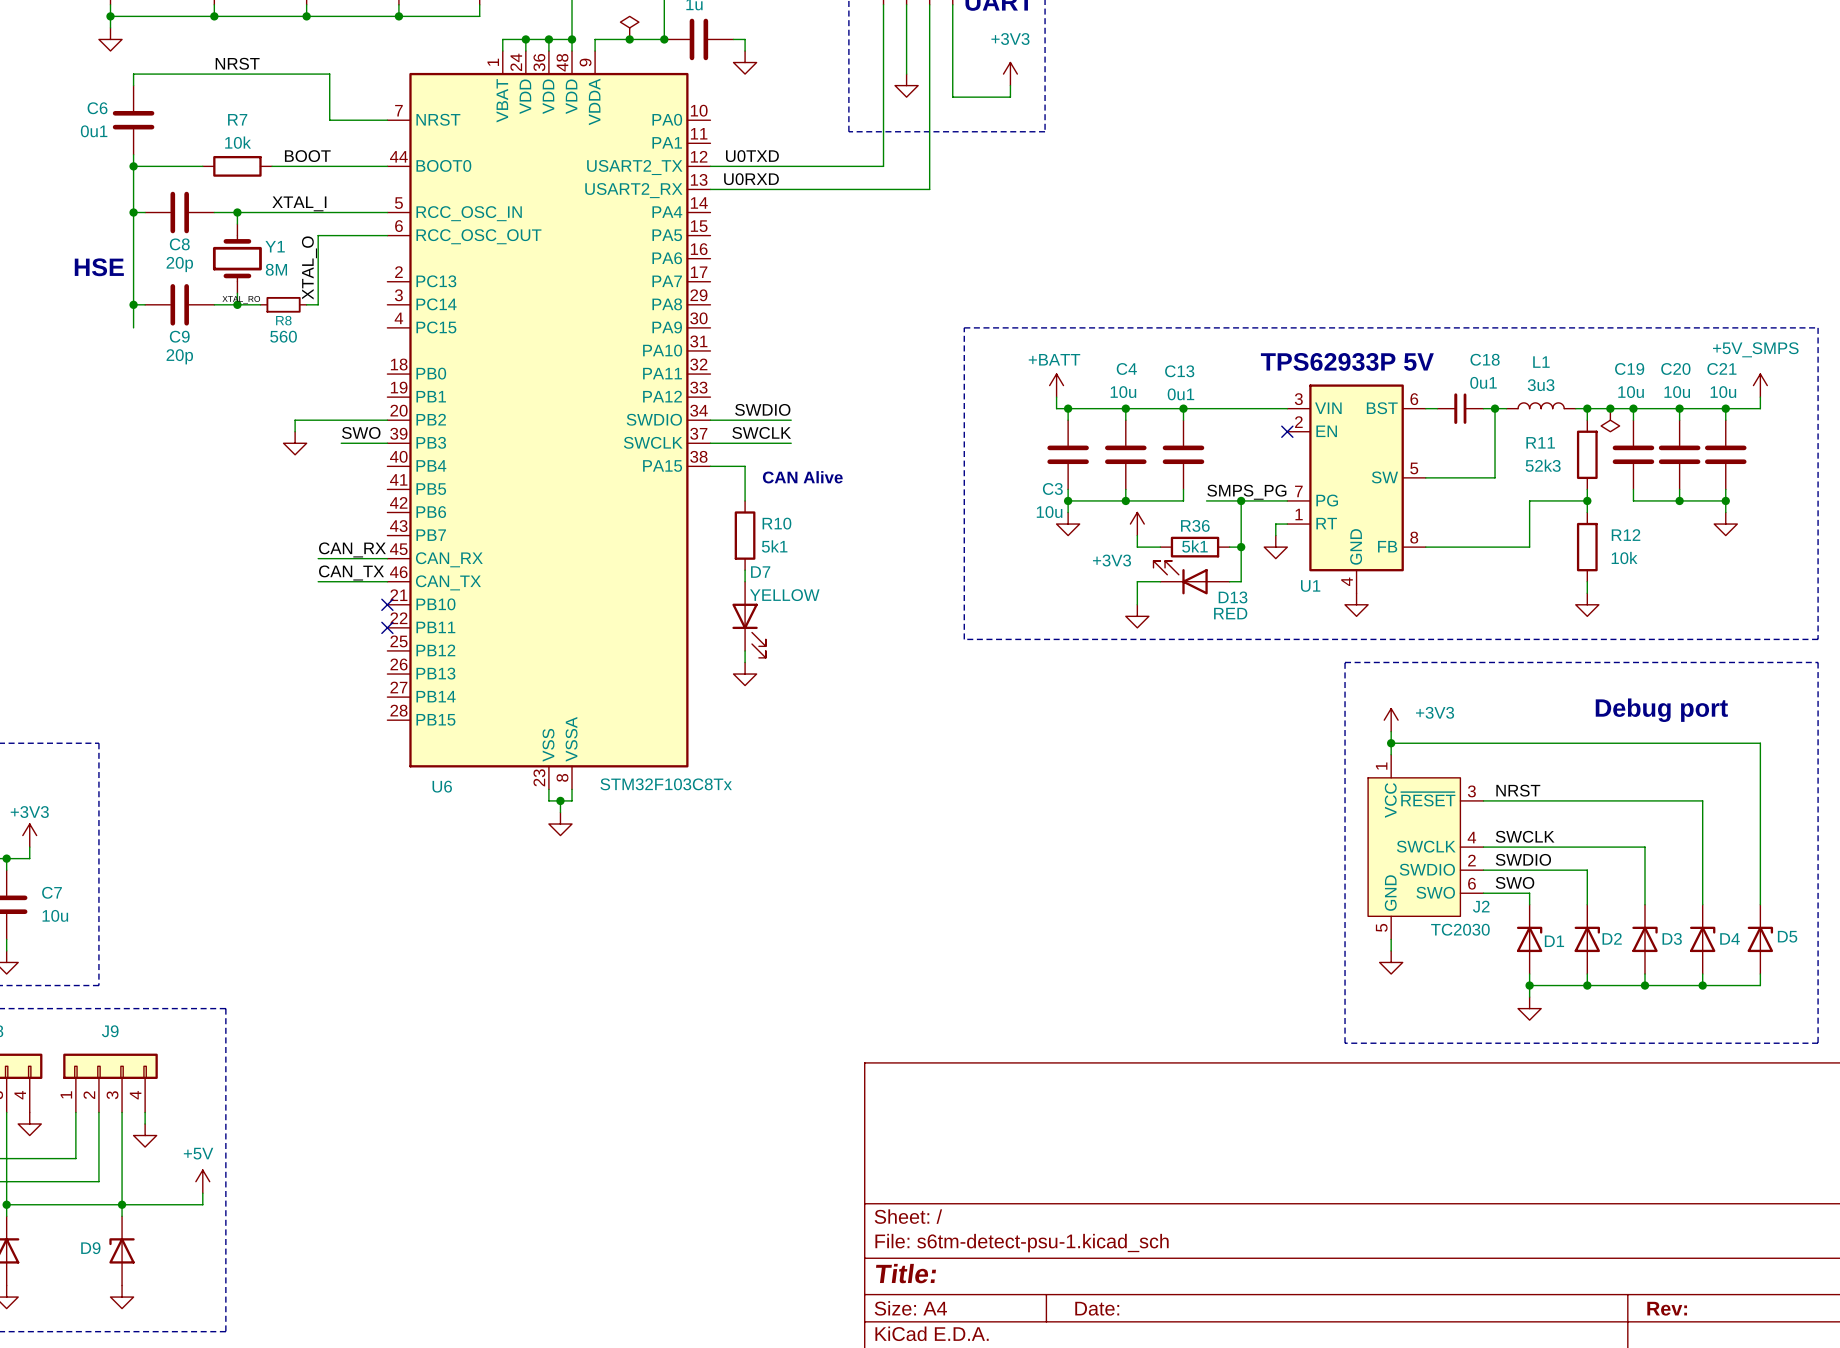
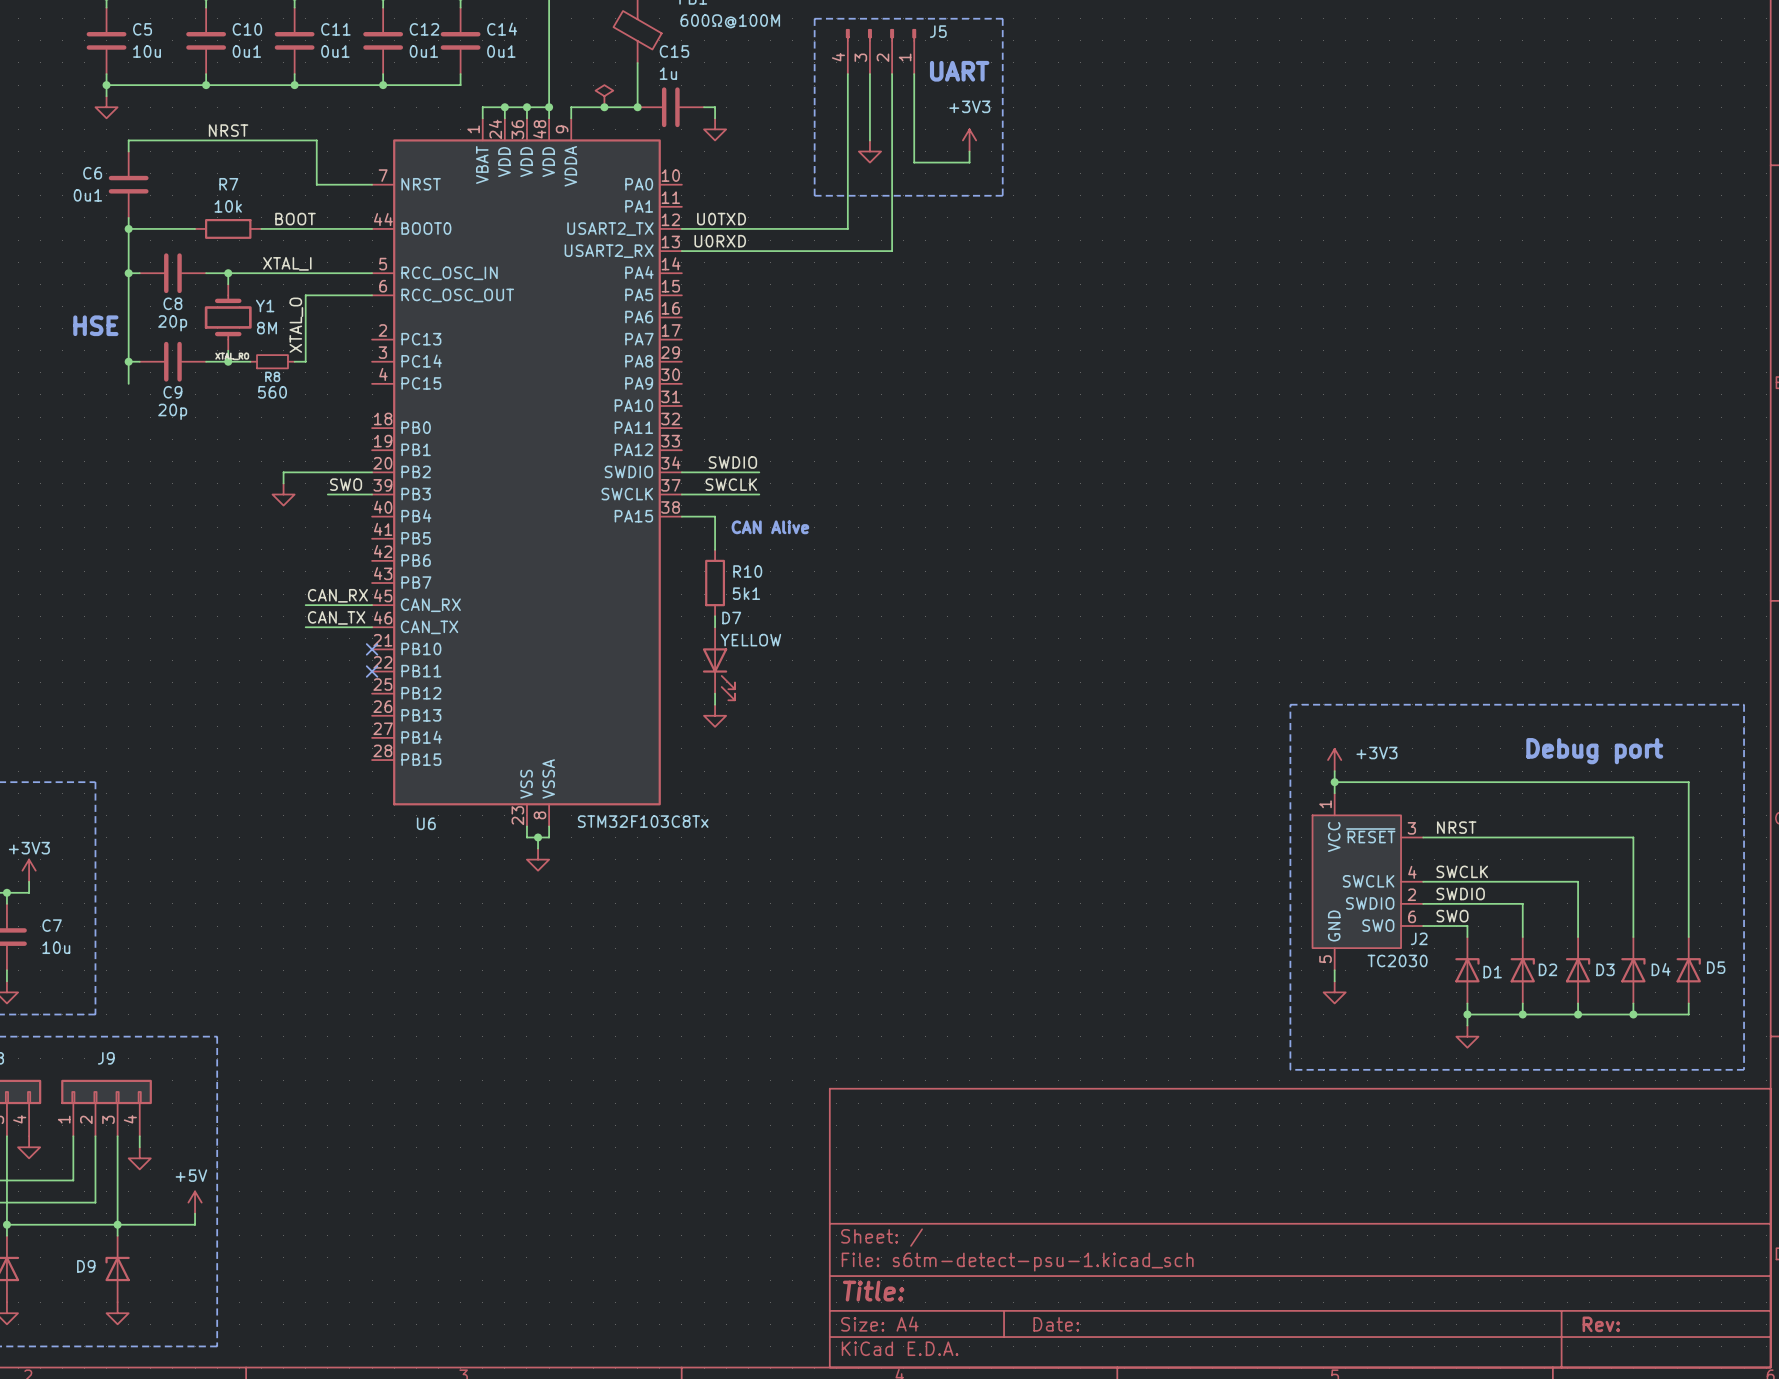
line: (964, 327) (1818, 327) (1818, 639) (964, 639) (964, 327) -> none
text: TPS62933P 5V (1347, 361) -> none
power symbol: +BATT (1056, 385) -> none
power symbol: +5V_SMPS (1760, 385) -> none
wire: (1056, 397) (1056, 408) (1287, 408) -> none
wire: (1760, 397) (1760, 408) (1575, 408) -> none
L1: 3u3 (1541, 405) -> none
wire: (1068, 408) (1068, 420) -> none
junction: (1068, 408) -> none
wire: (1125, 408) (1125, 420) -> none
junction: (1125, 408) -> none
wire: (1183, 408) (1183, 420) -> none
junction: (1183, 408) -> none
wire: (1425, 408) (1437, 408) -> none
C18: 0u1 (1460, 408) -> none
wire: (1483, 408) (1506, 408) -> none
wire: (1495, 408) (1495, 477) (1425, 477) -> none
junction: (1495, 408) -> none
wire: (1587, 408) (1587, 420) -> none
junction: (1587, 408) -> none
junction: (1610, 408) -> none
wire: (1633, 408) (1633, 420) -> none
junction: (1633, 408) -> none
wire: (1679, 408) (1679, 420) -> none
junction: (1679, 408) -> none
wire: (1725, 408) (1725, 420) -> none
junction: (1725, 408) -> none
power symbol: (1610, 420) -> none
no-connect mark: (1287, 431) -> none
C3: 10u (1068, 454) -> none
C4: 10u (1125, 454) -> none
C13: 0u1 (1183, 454) -> none
R11: 52k3 (1587, 454) -> none
C19: 10u (1633, 454) -> none
C20: 10u (1679, 454) -> none
C21: 10u (1725, 454) -> none
U1: (1356, 488) -> none
wire: (1068, 489) (1068, 512) -> none
wire: (1125, 489) (1125, 500) -> none
wire: (1183, 489) (1183, 500) (1068, 500) -> none
wire: (1587, 489) (1587, 512) -> none
wire: (1633, 489) (1633, 500) (1725, 500) -> none
wire: (1679, 489) (1679, 500) -> none
wire: (1725, 489) (1725, 512) -> none
label: SMPS_PG (1246, 492) -> none
junction: (1068, 500) -> none
junction: (1125, 500) -> none
wire: (1206, 500) (1287, 500) -> none
wire: (1241, 500) (1241, 581) (1229, 581) -> none
junction: (1241, 500) -> none
wire: (1587, 500) (1529, 500) (1529, 547) (1425, 547) -> none
junction: (1587, 500) -> none
junction: (1679, 500) -> none
junction: (1725, 500) -> none
power symbol: (1068, 524) -> none
power symbol: +3V3 (1137, 524) -> none
wire: (1287, 524) (1275, 524) (1275, 535) -> none
power symbol: (1725, 524) -> none
wire: (1137, 535) (1137, 547) (1160, 547) -> none
R36: 5k1 (1195, 547) -> none
wire: (1229, 547) (1241, 547) -> none
junction: (1241, 547) -> none
power symbol: (1275, 547) -> none
R12: 10k (1587, 547) -> none
D13: RED (1191, 577) -> none
wire: (1160, 581) (1137, 581) (1137, 604) -> none
wire: (1587, 581) (1587, 593) -> none
power symbol: (1356, 604) -> none
power symbol: (1587, 604) -> none
power symbol: (1137, 616) -> none

